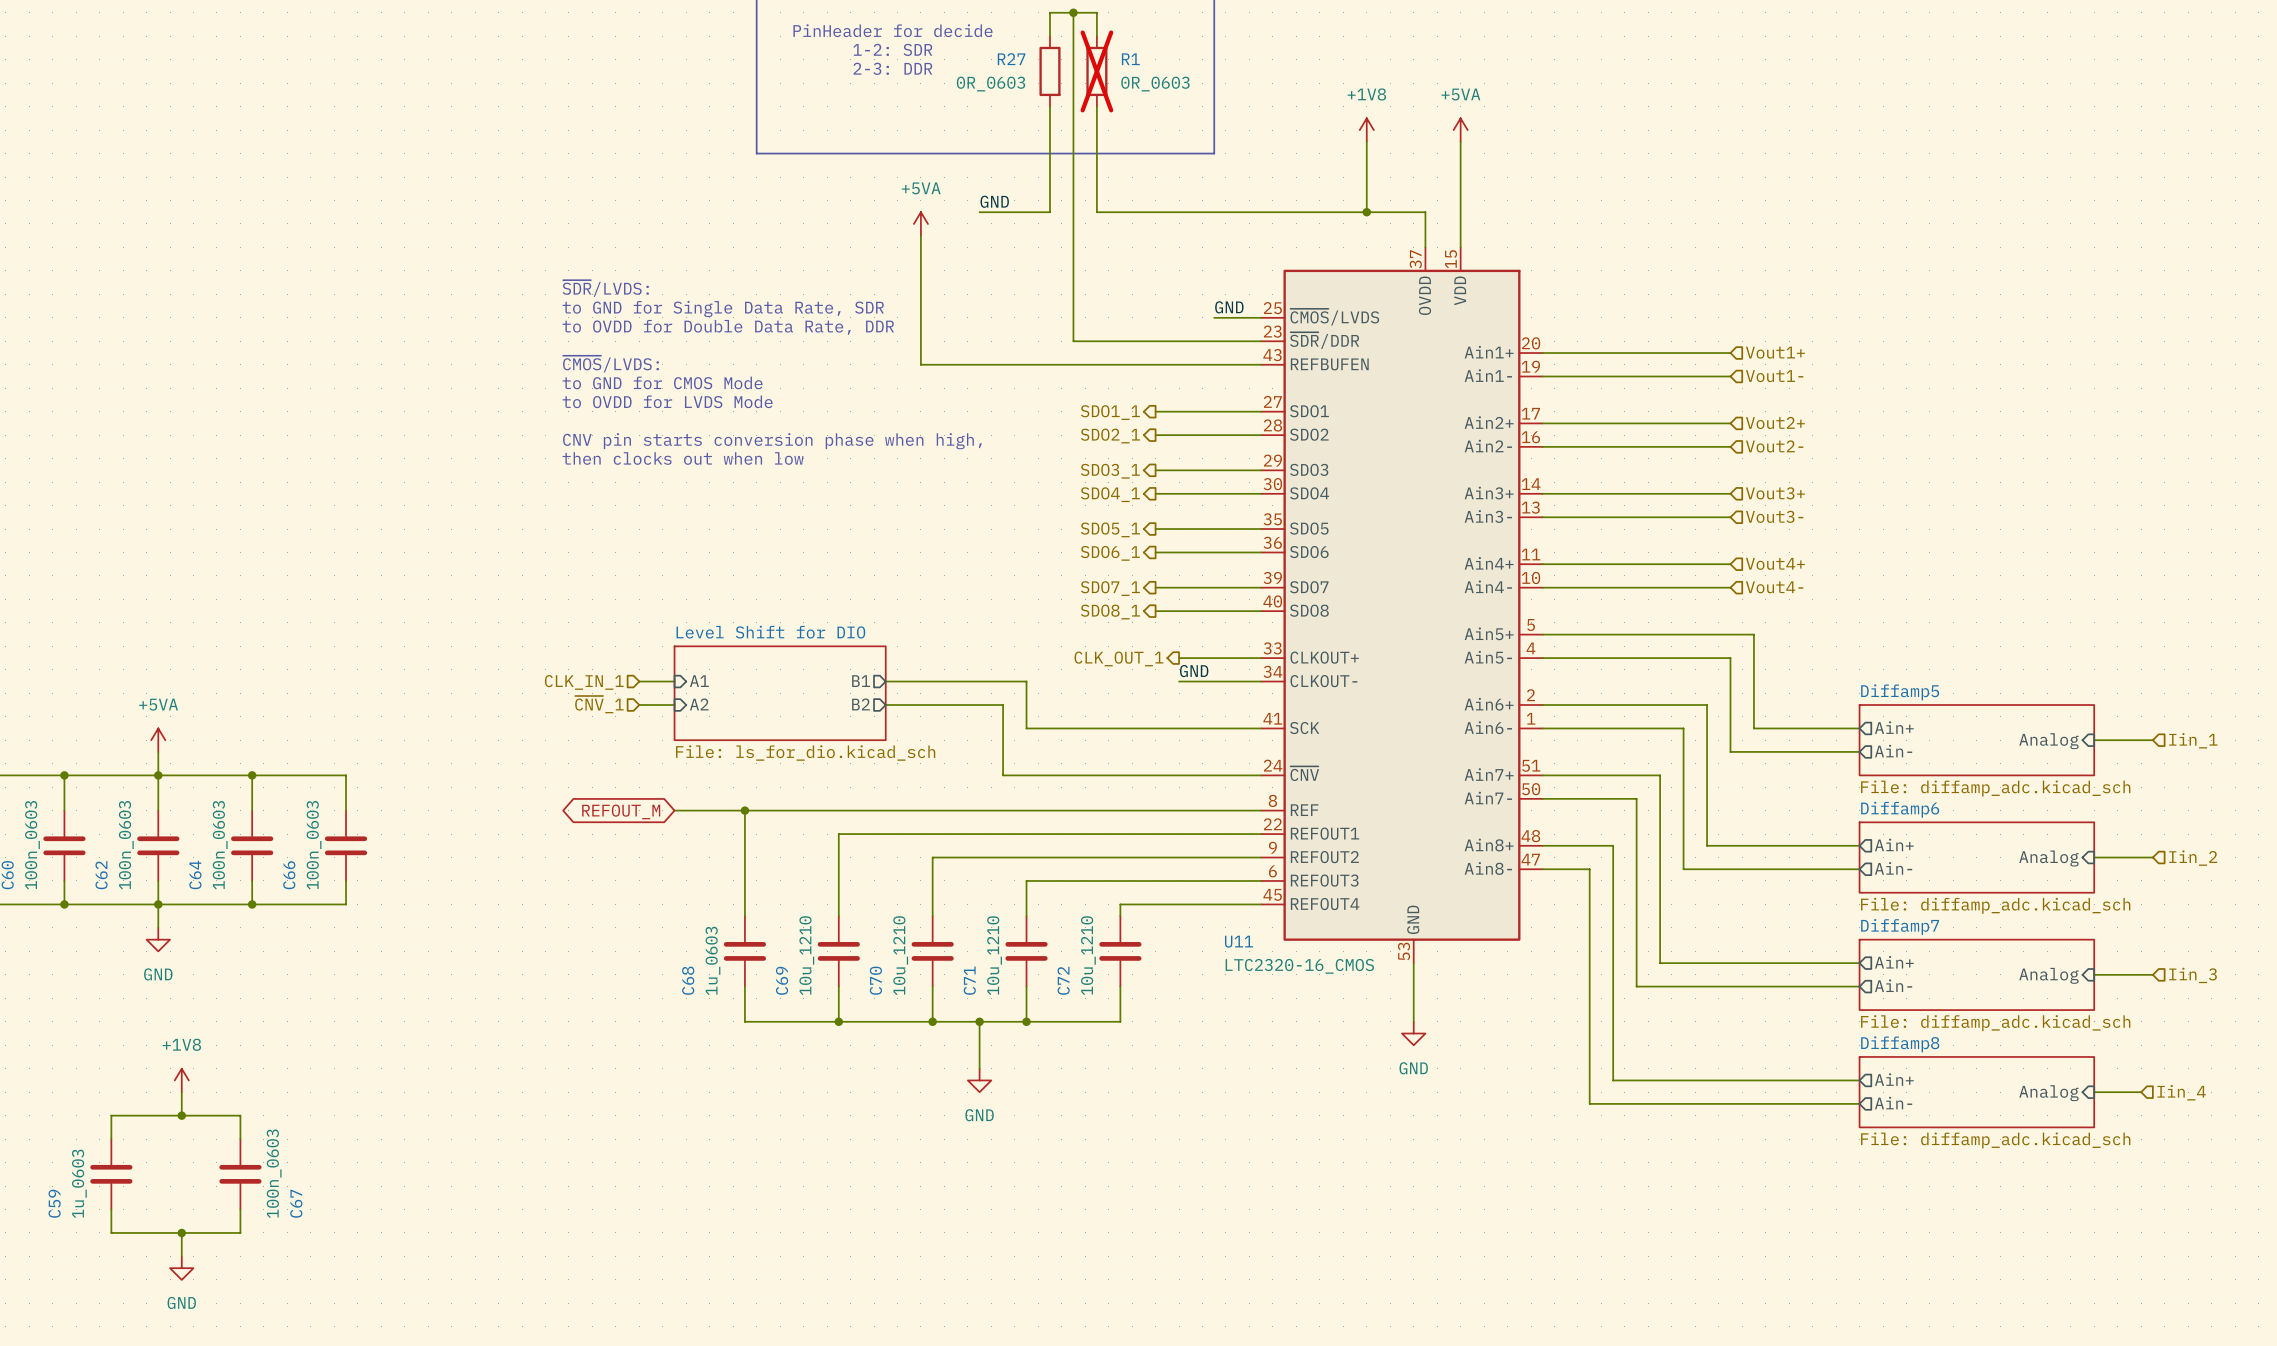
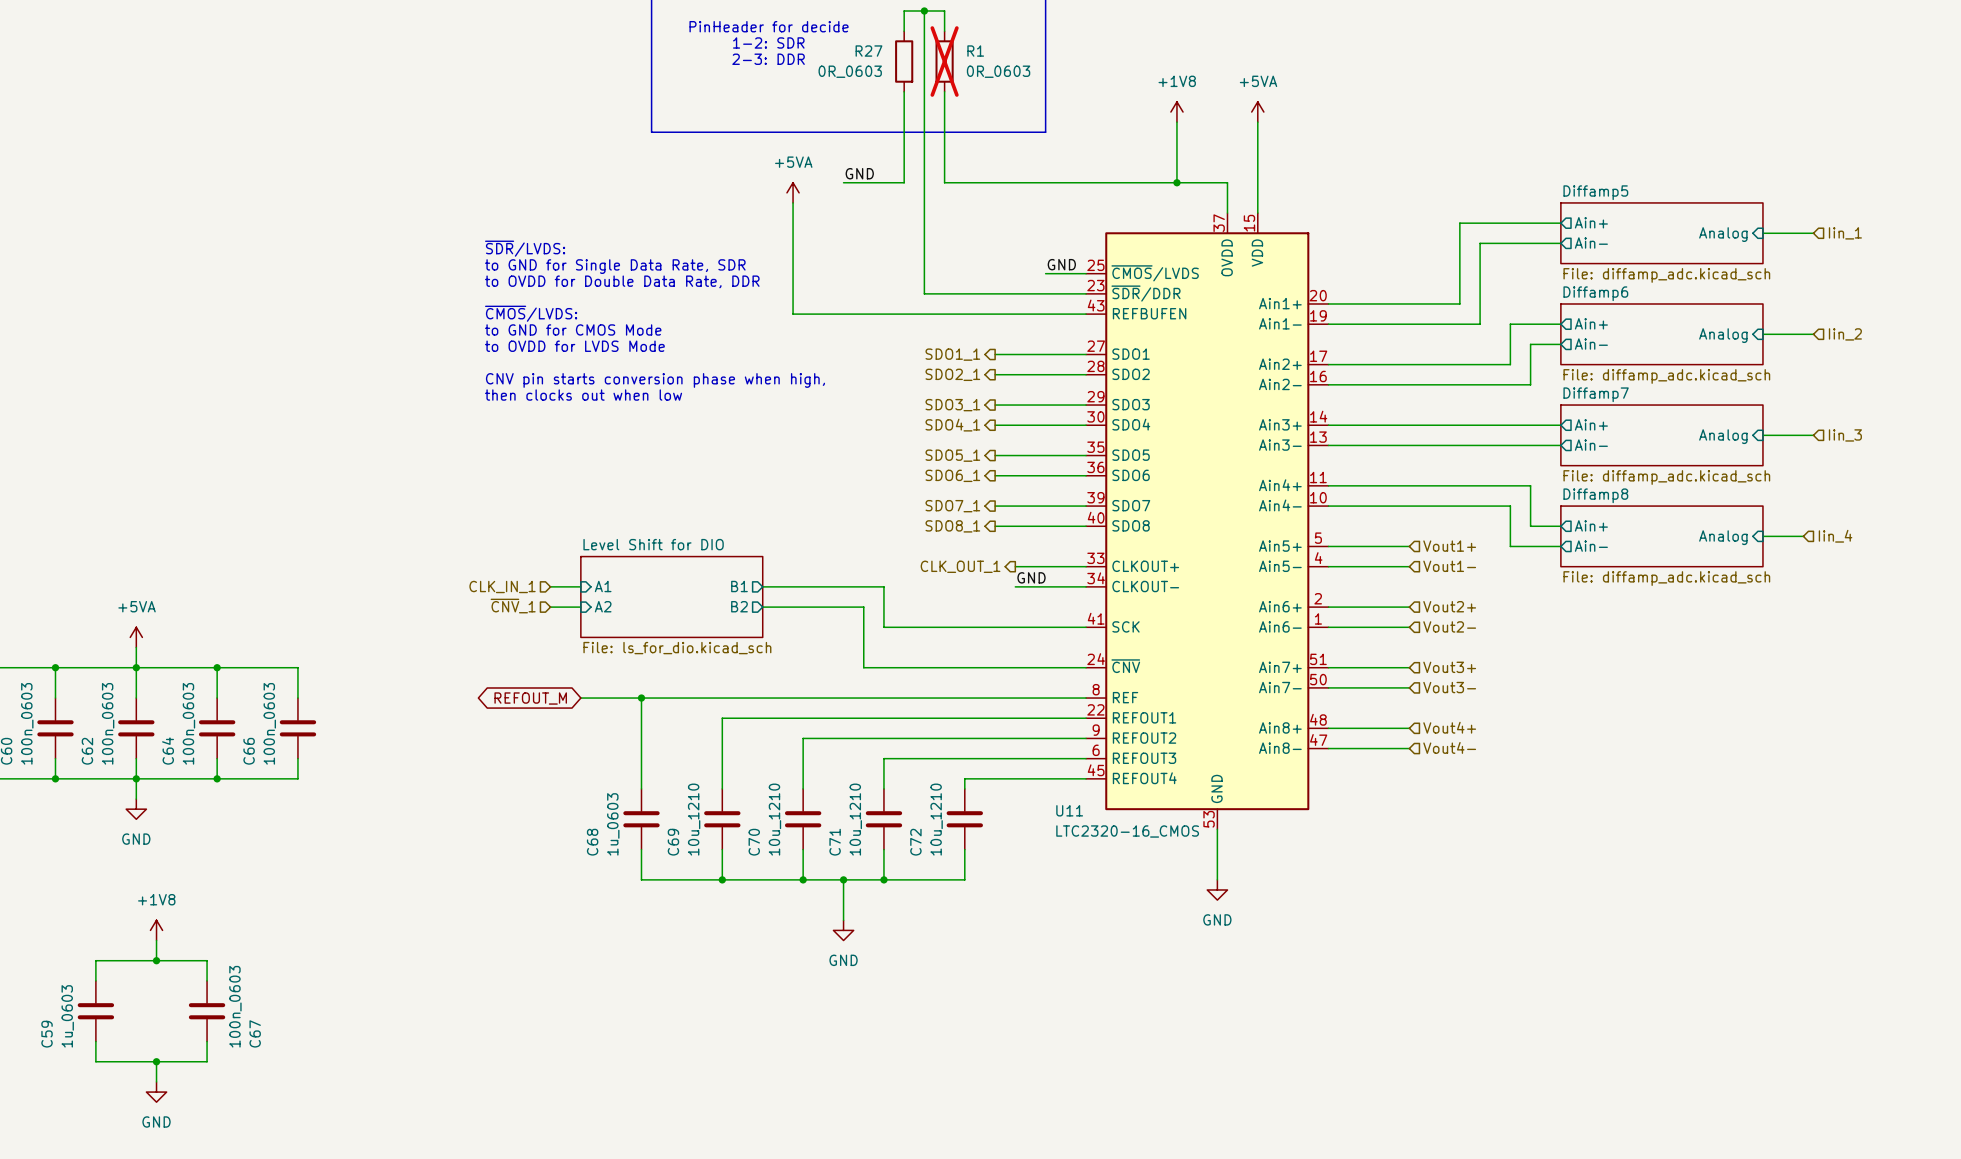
sheet pin: none -> Ain+ (1591, 222)
wire: none -> (1762, 233) (1813, 233)
sheet pin: none -> Analog (1723, 234)
hierarchical label: none -> Iin_1 (1845, 233)
sheet pin: none -> Ain- (1591, 242)
hierarchical label: Vout1+ (1775, 352) -> none
wire: (1695, 353) (1730, 353) -> (1459, 303) (1459, 223) (1560, 223)
sheet pin: none -> Ain+ (1591, 323)
wire: (1718, 376) (1730, 376) -> (1480, 324) (1480, 243) (1560, 243)
hierarchical label: Vout1- (1774, 376) -> none
wire: none -> (1560, 324) (1510, 324) (1510, 364) (1490, 364)
wire: none -> (1762, 334) (1813, 334)
hierarchical label: none -> Iin_2 (1845, 334)
sheet pin: none -> Analog (1723, 335)
wire: none -> (1560, 344) (1530, 344) (1530, 384) (1490, 384)
sheet pin: none -> Ain- (1591, 344)
hierarchical label: Vout2+ (1775, 422) -> none
hierarchical label: Vout2- (1774, 446) -> none
sheet pin: none -> Ain+ (1591, 424)
wire: none -> (1490, 425) (1560, 425)
hierarchical label: Vout3+ (1775, 493) -> none
wire: none -> (1762, 435) (1813, 435)
sheet pin: none -> Analog (1723, 436)
hierarchical label: none -> Iin_3 (1845, 435)
hierarchical label: Vout3- (1774, 516) -> none
sheet pin: none -> Ain- (1591, 445)
wire: none -> (1490, 445) (1560, 445)
hierarchical label: Vout4+ (1775, 563) -> none
wire: none -> (1490, 485) (1530, 485) (1530, 526) (1560, 526)
wire: none -> (1490, 506) (1510, 506) (1510, 546) (1560, 546)
hierarchical label: Vout4- (1774, 587) -> none
sheet pin: none -> Ain+ (1591, 525)
wire: none -> (1762, 536) (1803, 536)
sheet pin: none -> Analog (1723, 537)
hierarchical label: none -> Iin_4 (1835, 536)
sheet pin: none -> Ain- (1591, 546)
wire: (1636, 634) (1753, 634) (1753, 728) (1859, 728) -> none
hierarchical label: none -> Vout1+ (1449, 546)
hierarchical label: none -> Vout1- (1449, 566)
wire: (1636, 658) (1730, 658) (1730, 751) (1859, 751) -> none
hierarchical label: none -> Vout2+ (1449, 606)
wire: (1636, 705) (1707, 705) (1707, 845) (1859, 845) -> none
sheet pin: Ain+ (1894, 727) -> none
wire: (1636, 728) (1683, 728) (1683, 869) (1859, 869) -> none
hierarchical label: none -> Vout2- (1449, 626)
sheet Diffamp5 position: (1976, 740) -> (1661, 233)
wire: (2094, 740) (2152, 740) -> none
hierarchical label: Iin_1 (2193, 740) -> none
sheet pin: Analog (2048, 741) -> none
sheet pin: Ain- (1893, 751) -> none
hierarchical label: none -> Vout3+ (1449, 667)
wire: (1636, 775) (1660, 775) (1660, 963) (1859, 963) -> none
wire: (1636, 798) (1636, 986) (1859, 986) -> none
hierarchical label: none -> Vout3- (1449, 687)
sheet pin: Ain+ (1894, 844) -> none
wire: (1613, 845) (1613, 1080) (1859, 1080) -> (1389, 728) (1409, 728)
hierarchical label: none -> Vout4+ (1449, 727)
sheet Diffamp6 position: (1976, 857) -> (1661, 334)
wire: (2094, 857) (2152, 857) -> none
sheet pin: Analog (2048, 858) -> none
hierarchical label: Iin_2 (2193, 858) -> none
hierarchical label: none -> Vout4- (1449, 747)
sheet pin: Ain- (1893, 868) -> none
wire: (1589, 869) (1589, 1103) (1859, 1103) -> (1368, 748) (1409, 748)
sheet pin: Ain+ (1894, 962) -> none
sheet Diffamp7 position: (1976, 974) -> (1661, 435)
wire: (2094, 974) (2152, 974) -> none
sheet pin: Analog (2048, 975) -> none
hierarchical label: Iin_3 (2193, 975) -> none
sheet pin: Ain- (1893, 985) -> none
sheet pin: Ain+ (1894, 1079) -> none
sheet Diffamp8 position: (1976, 1092) -> (1661, 536)
wire: (2094, 1092) (2141, 1092) -> none
hierarchical label: Iin_4 (2181, 1092) -> none
sheet pin: Analog (2048, 1093) -> none
sheet pin: Ain- (1893, 1103) -> none

